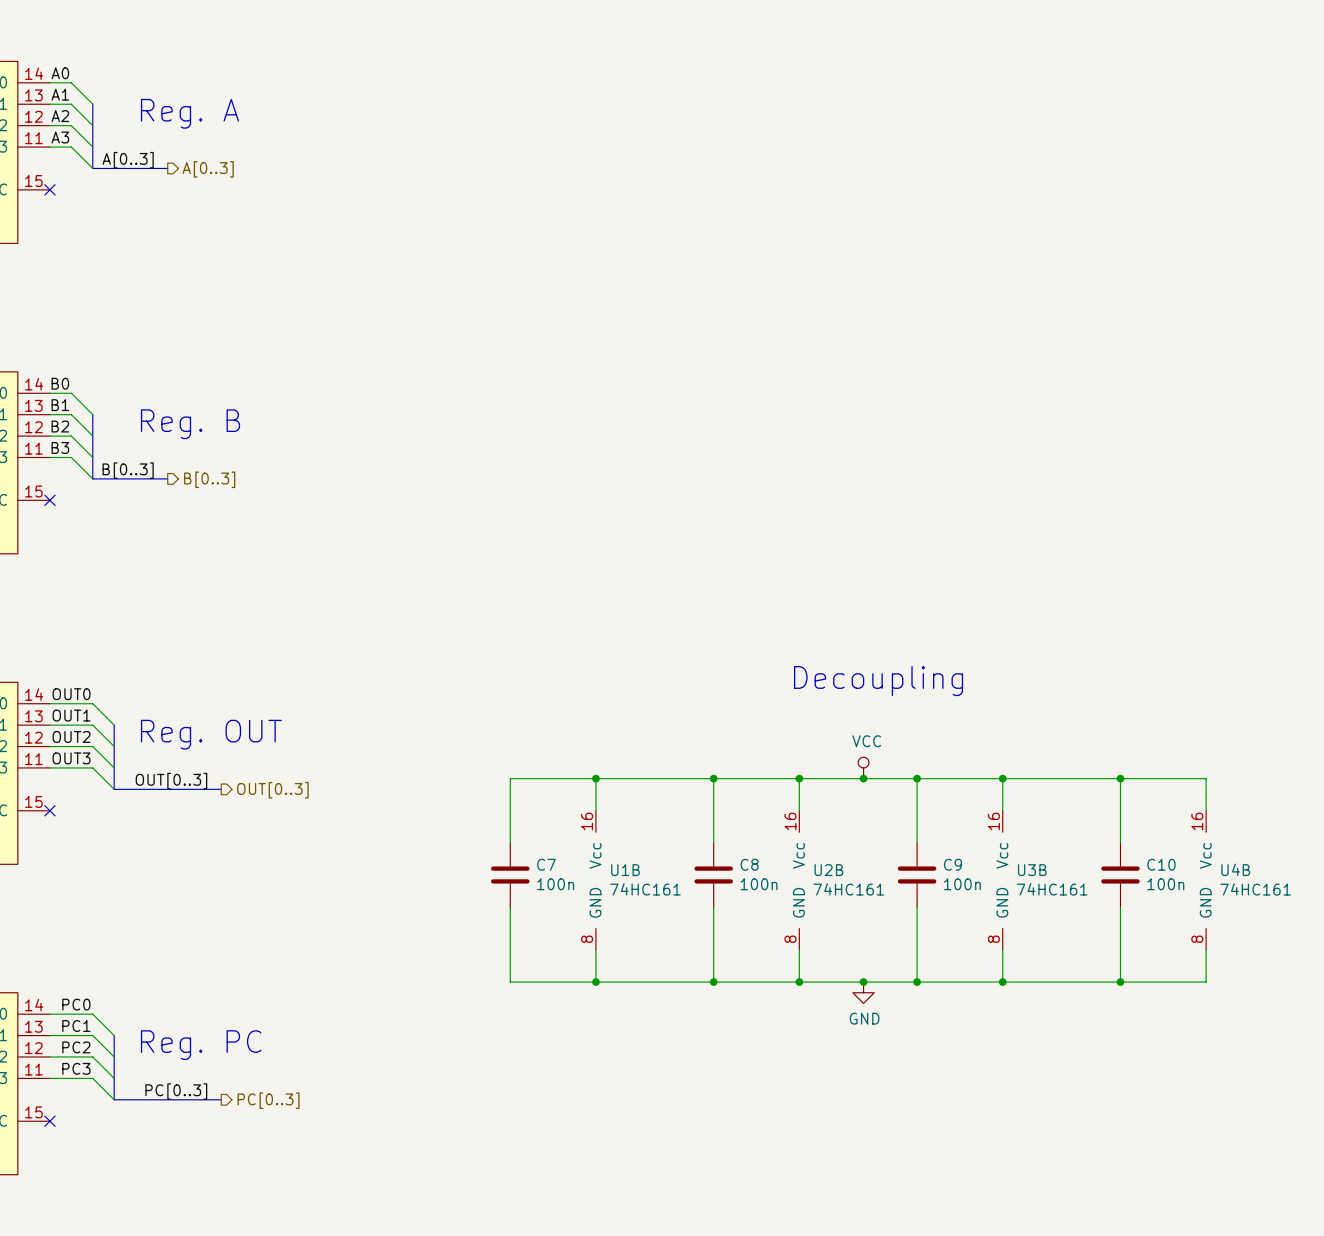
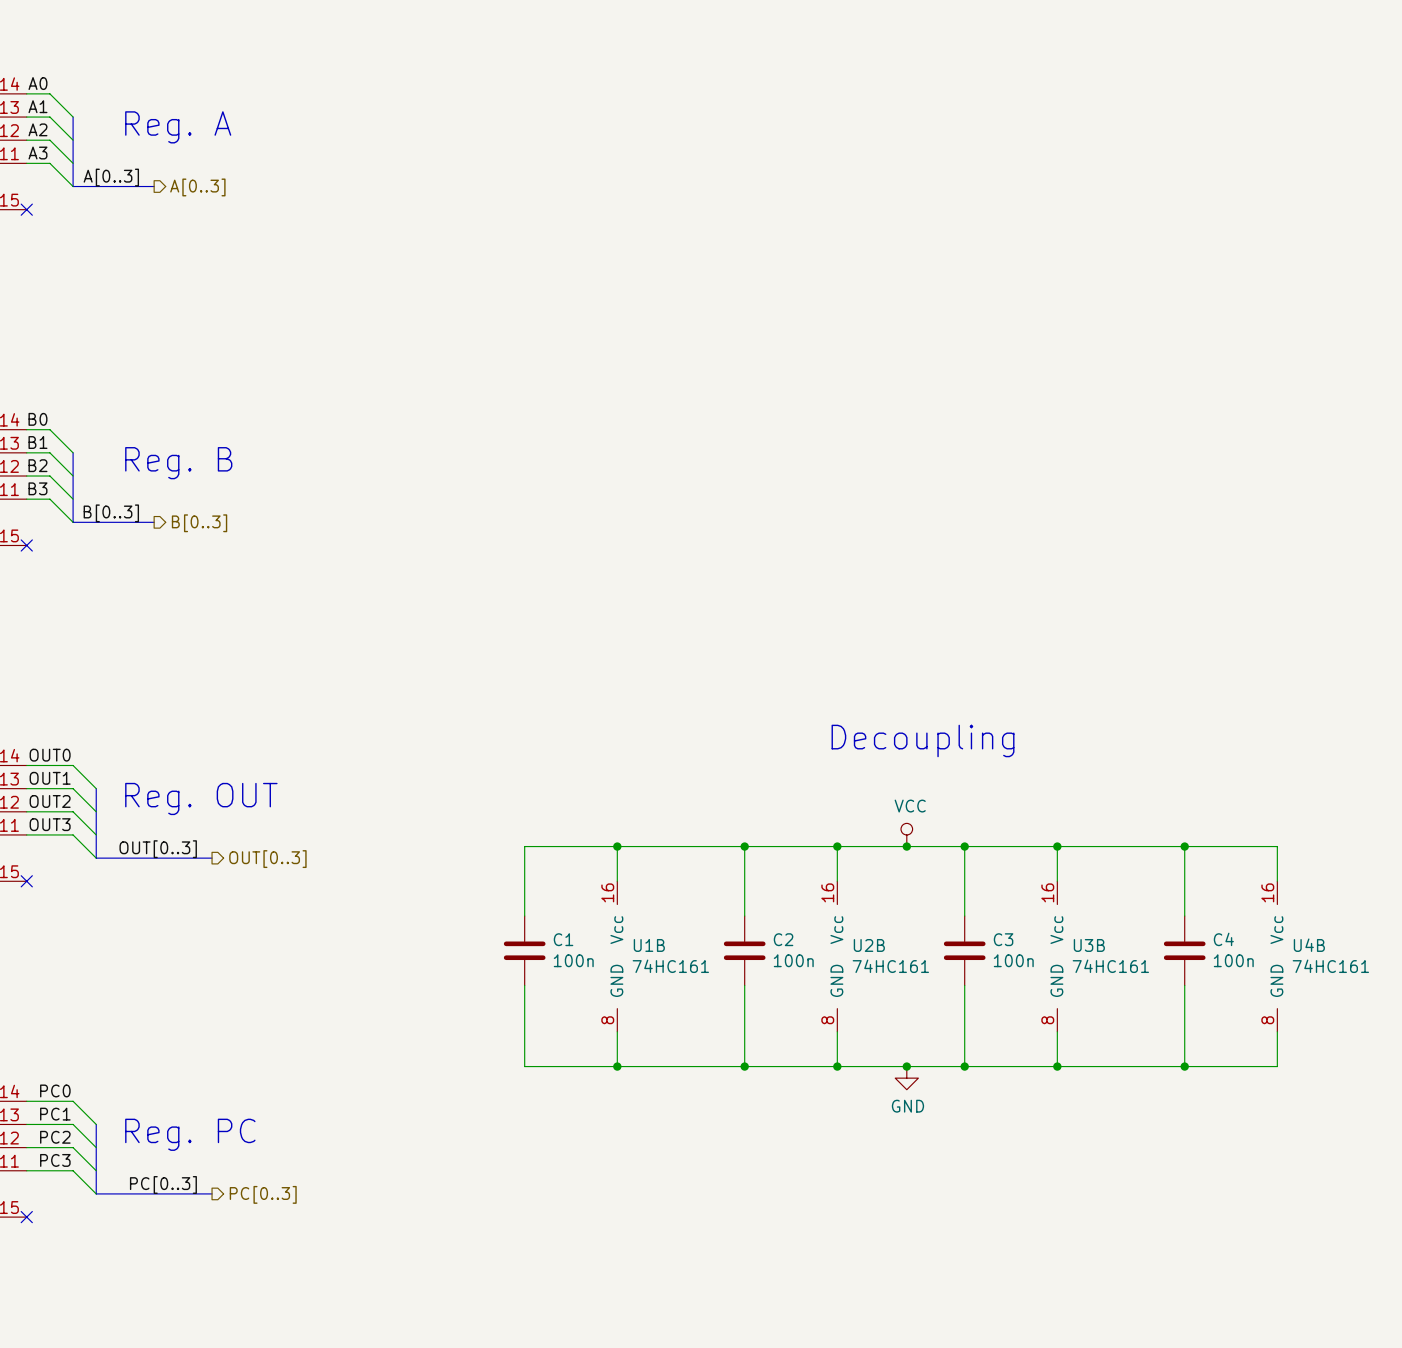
C7 name: C7 (546, 864) -> C1 (563, 939)
C8 name: C8 (749, 864) -> C2 (783, 939)
C9 name: C9 (953, 864) -> C3 (1003, 939)
C10 name: C10 (1161, 864) -> C4 (1223, 939)

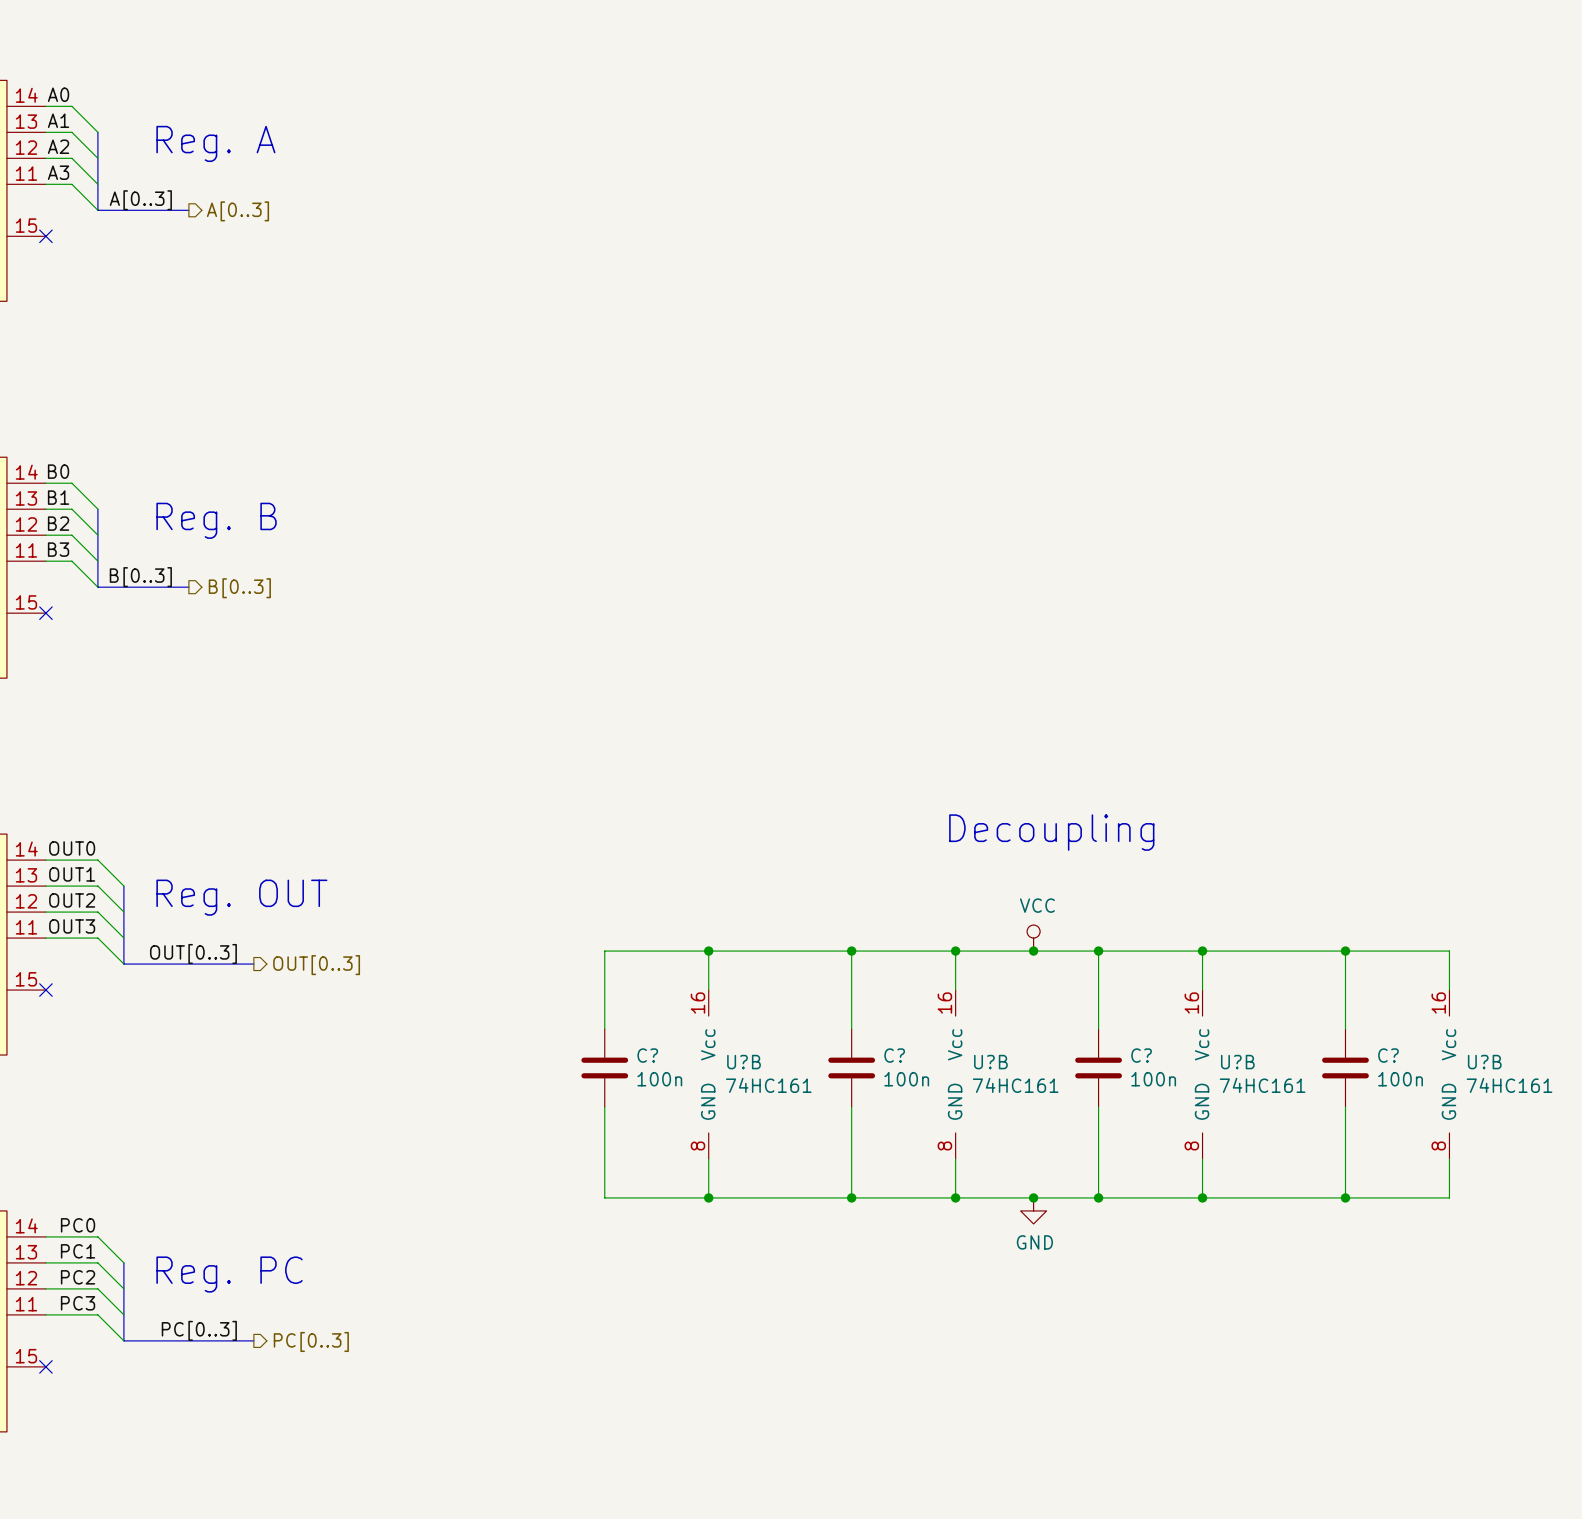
C1 name: C1 (563, 939) -> C? (647, 1055)
C2 name: C2 (783, 939) -> C? (894, 1055)
C3 name: C3 (1003, 939) -> C? (1141, 1055)
C4 name: C4 (1223, 939) -> C? (1388, 1055)
U1B name: U1B (649, 945) -> U?B (744, 1062)
U2B name: U2B (869, 945) -> U?B (990, 1062)
U3B name: U3B (1089, 945) -> U?B (1237, 1062)
U4B name: U4B (1309, 945) -> U?B (1484, 1062)

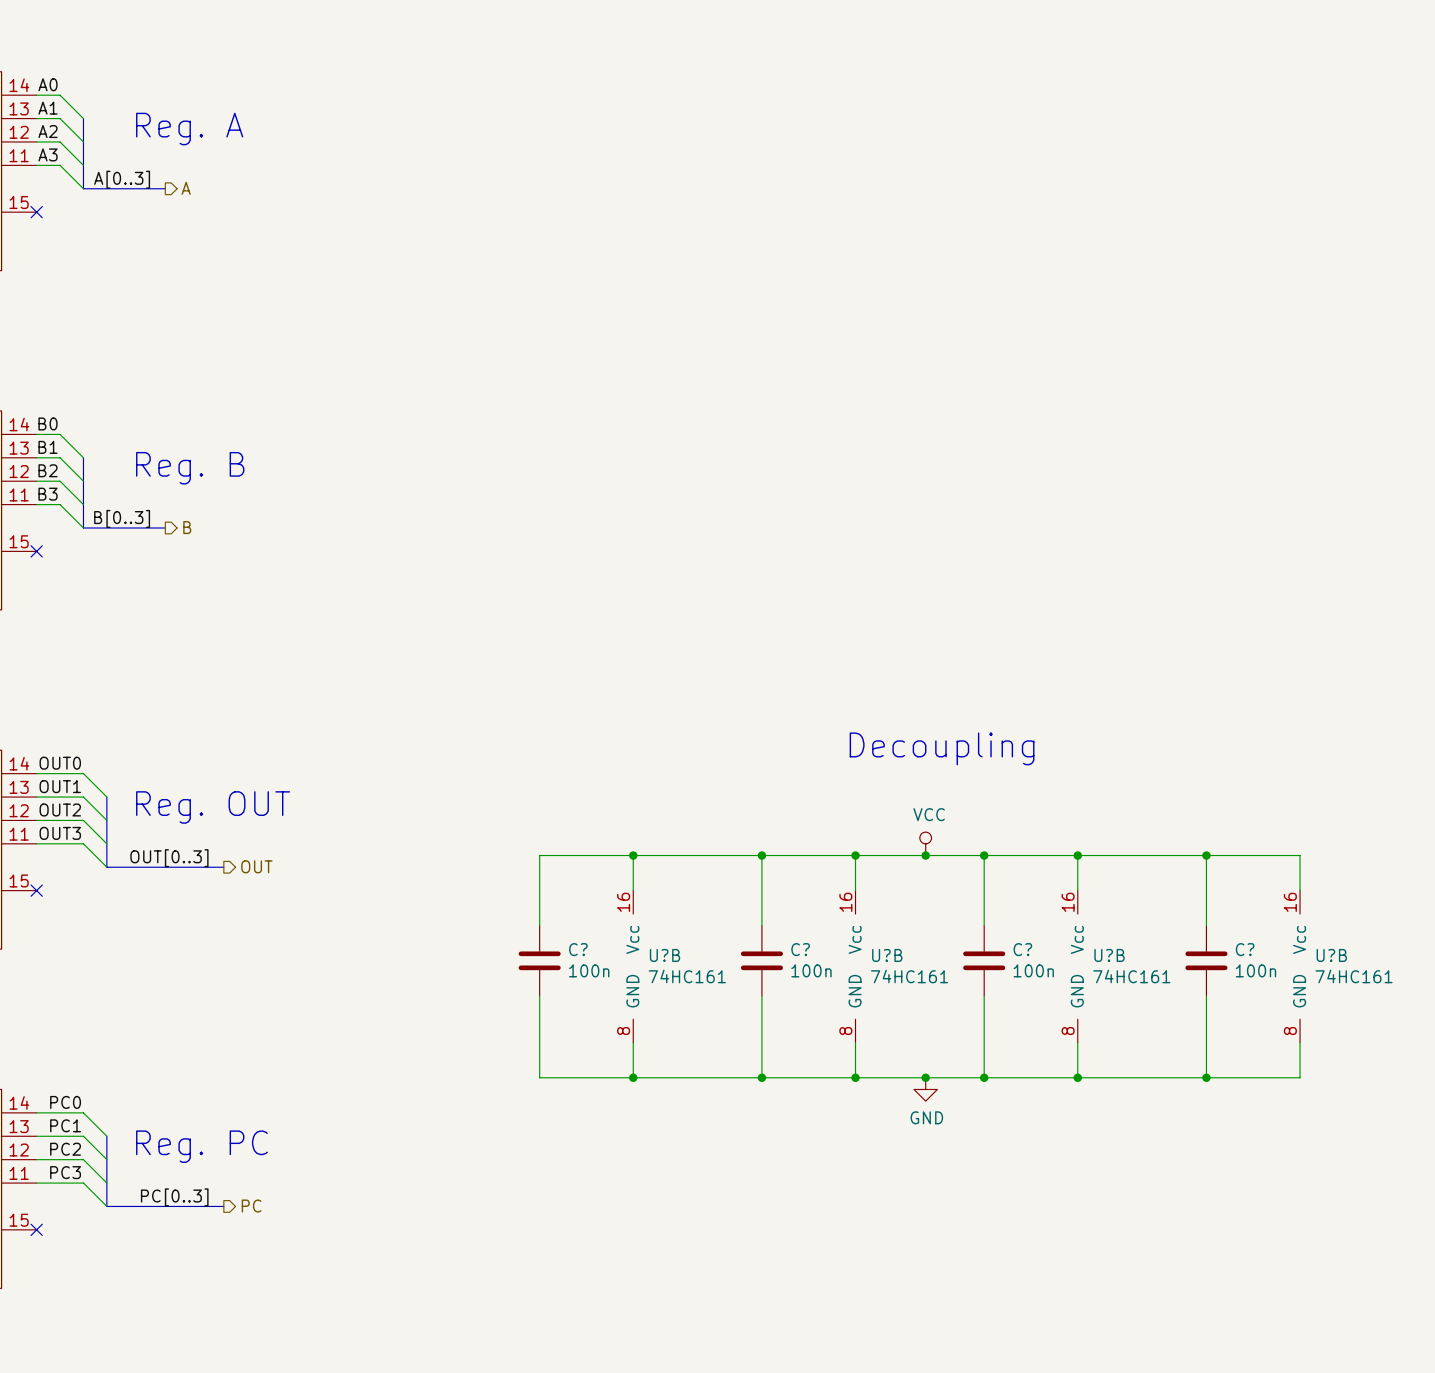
hierarchical label: A[0..3] (237, 211) -> A (186, 188)
hierarchical label: B[0..3] (239, 588) -> B (187, 527)
hierarchical label: OUT[0..3] (316, 965) -> OUT (256, 866)
hierarchical label: PC[0..3] (311, 1341) -> PC (251, 1206)

